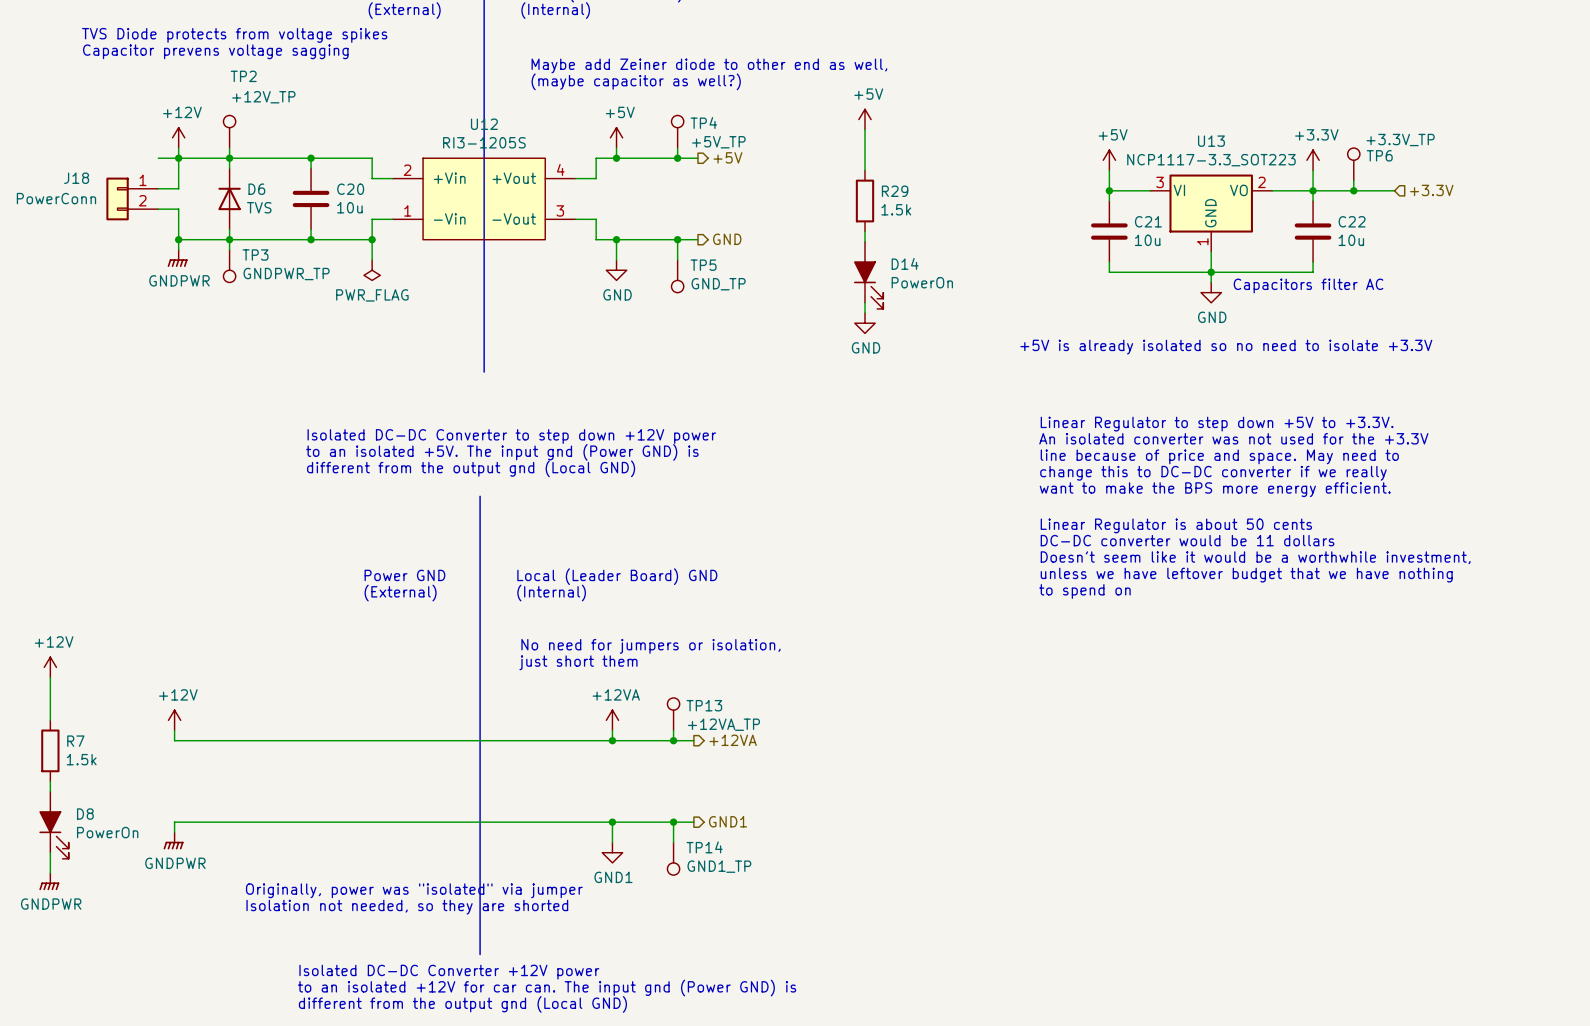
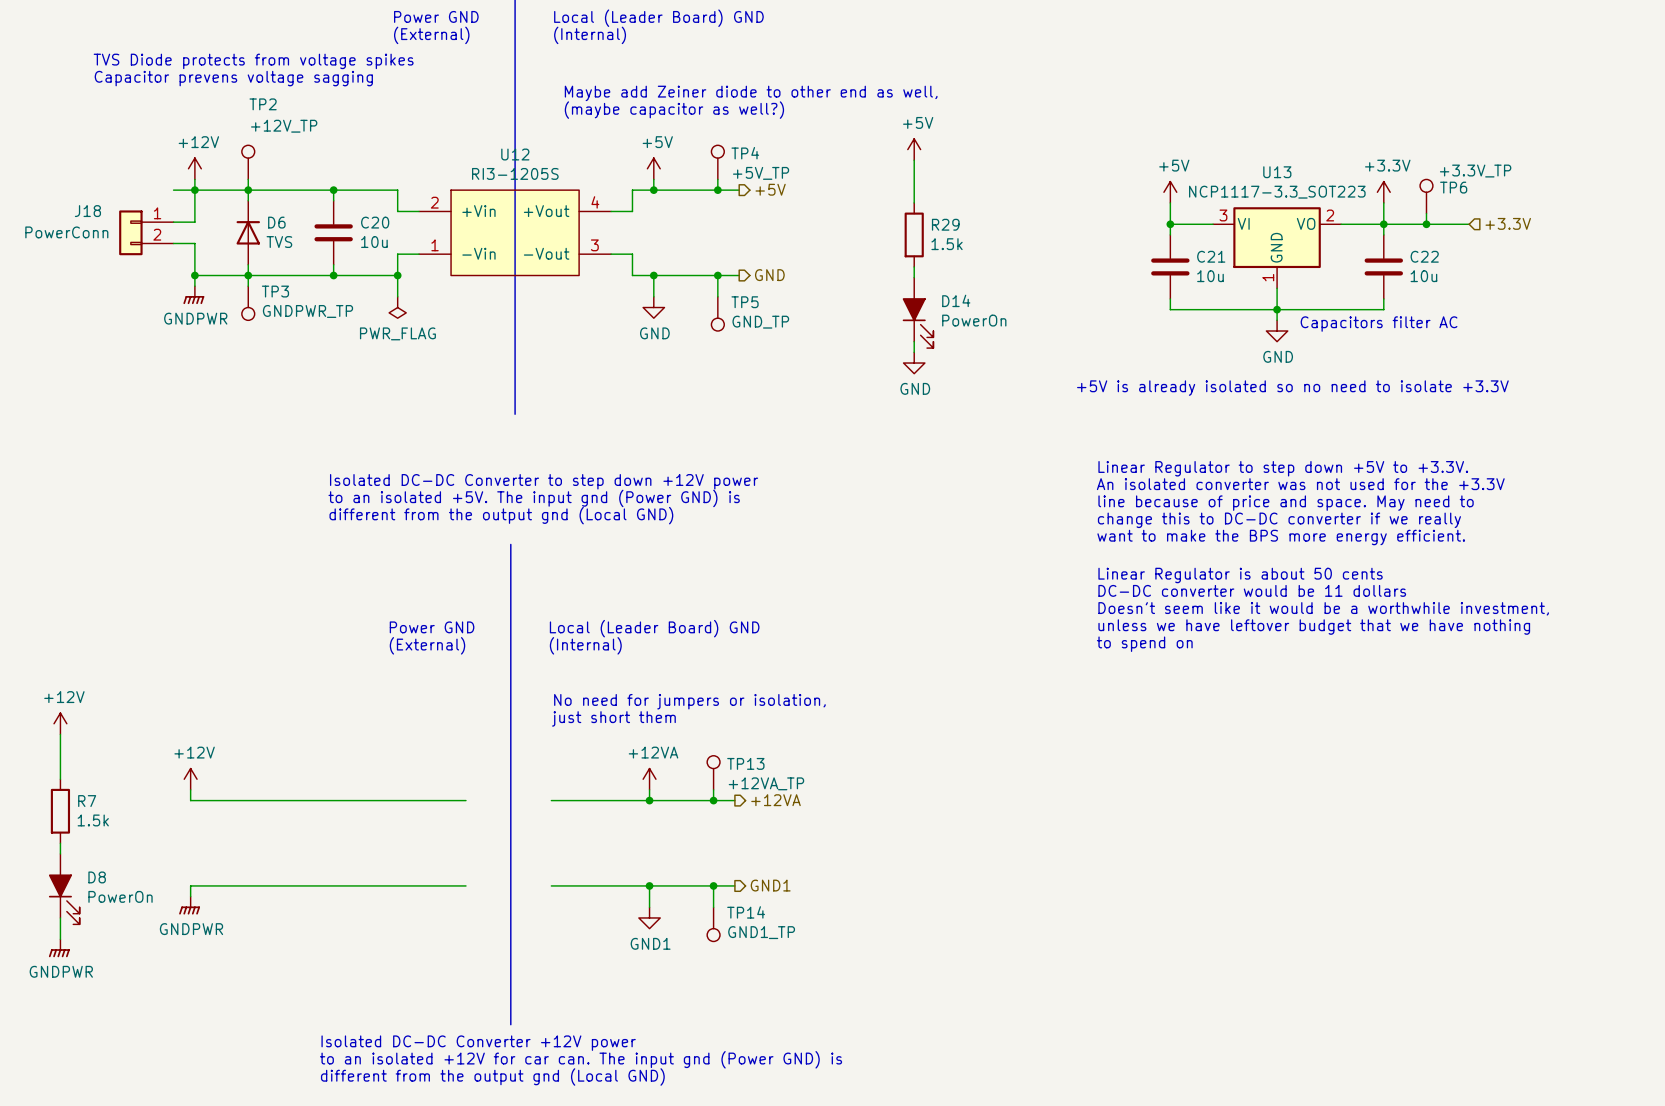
wire: (437, 740) (518, 740) -> none
wire: (437, 822) (518, 822) -> none
text: Originally, power was "isolated" via jumper (414, 890) -> none
text: Isolation not needed, so they are shorted (407, 907) -> none

